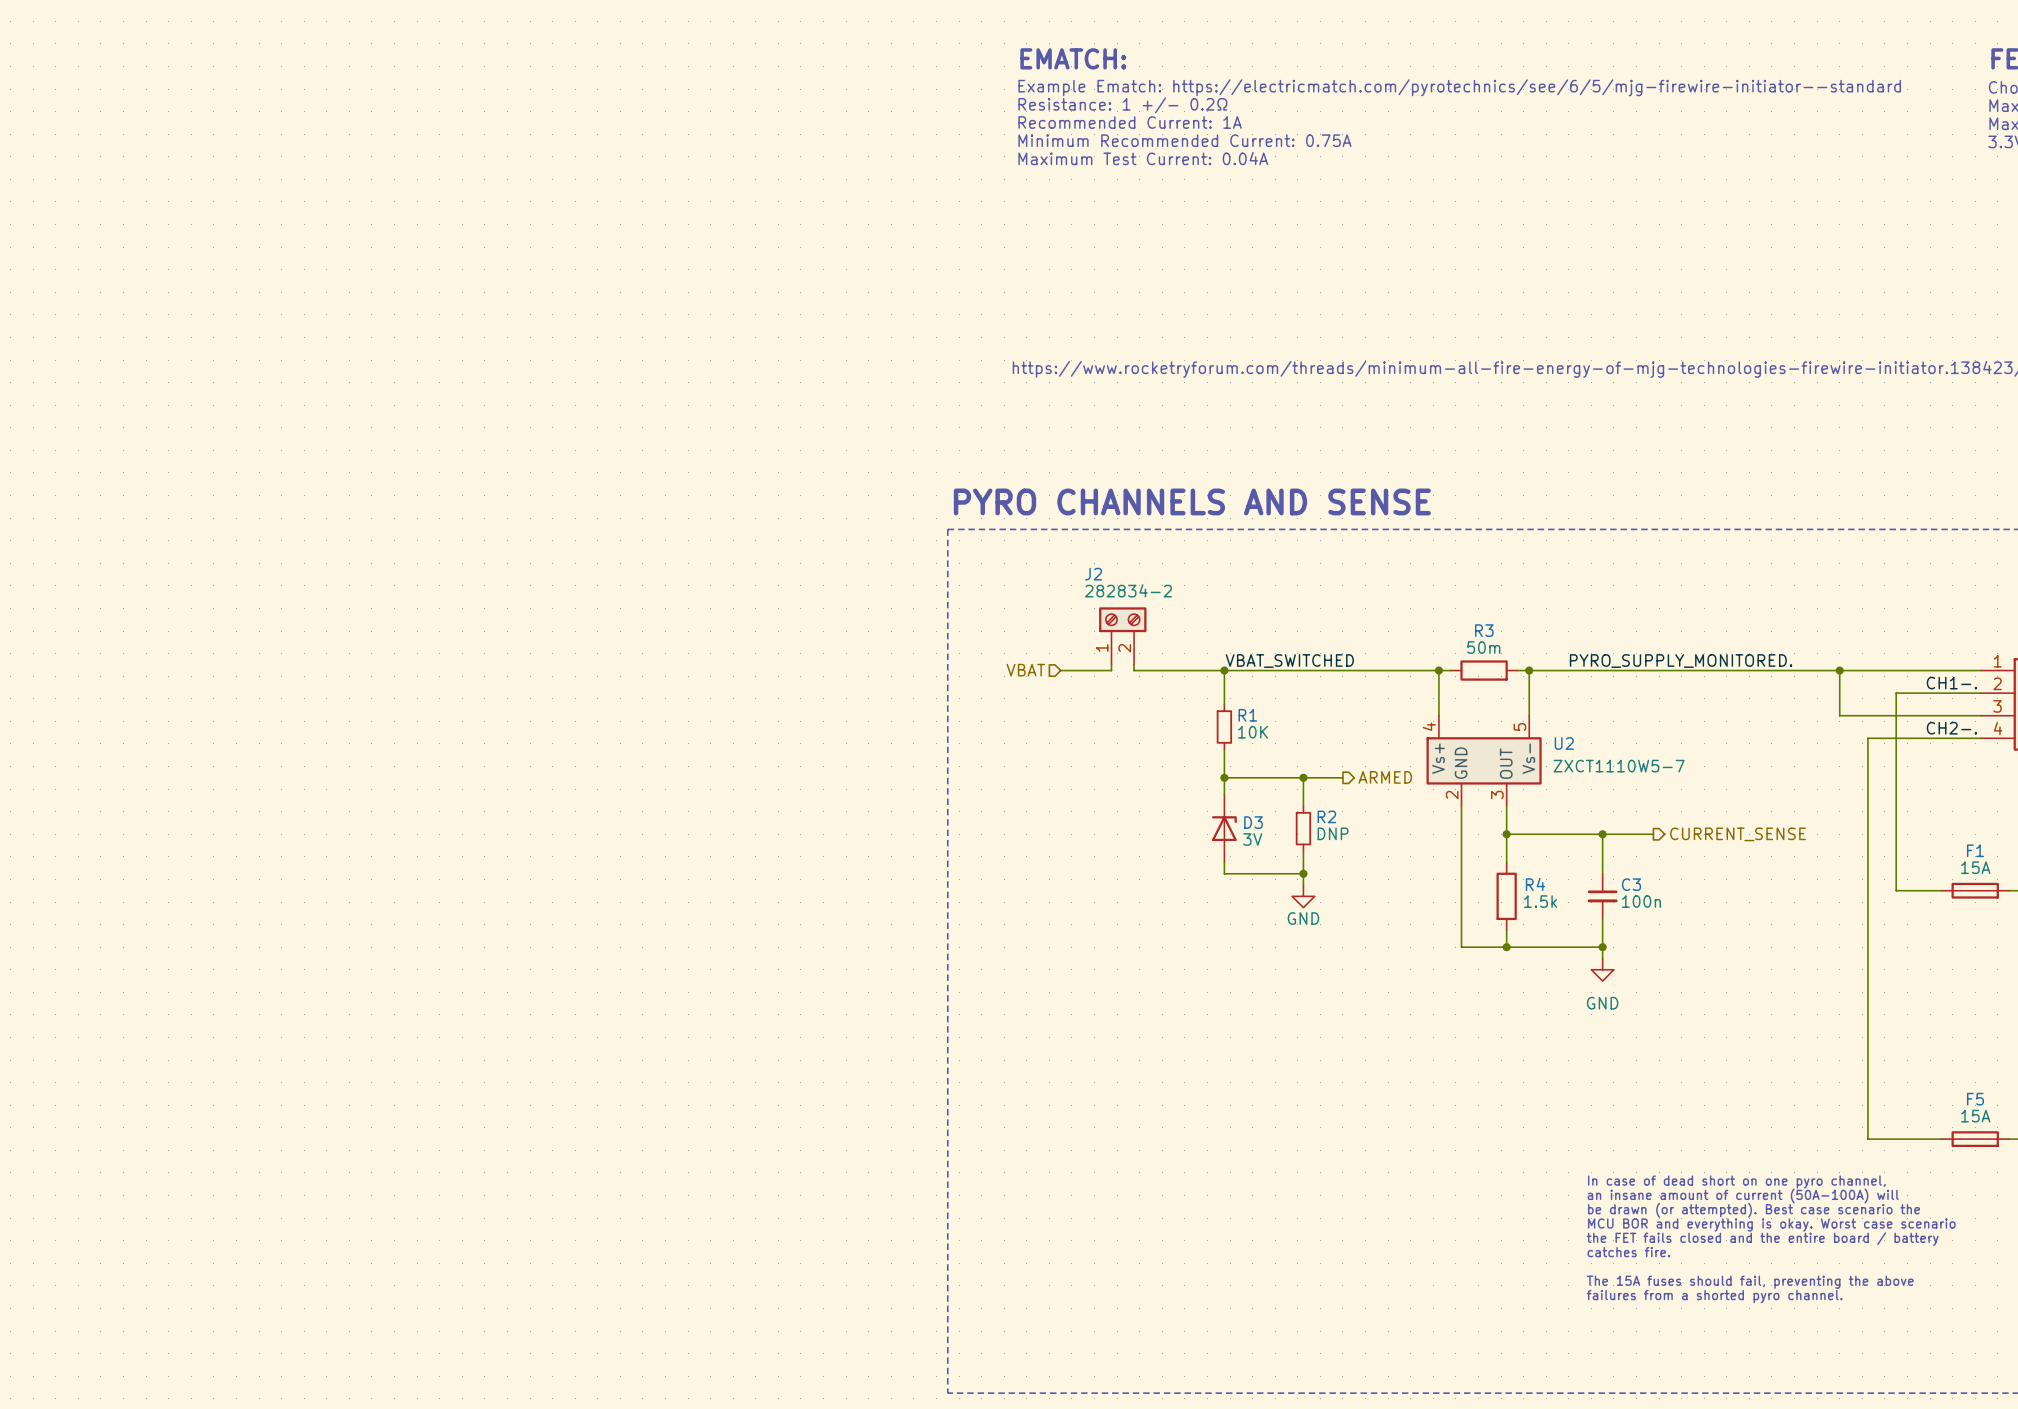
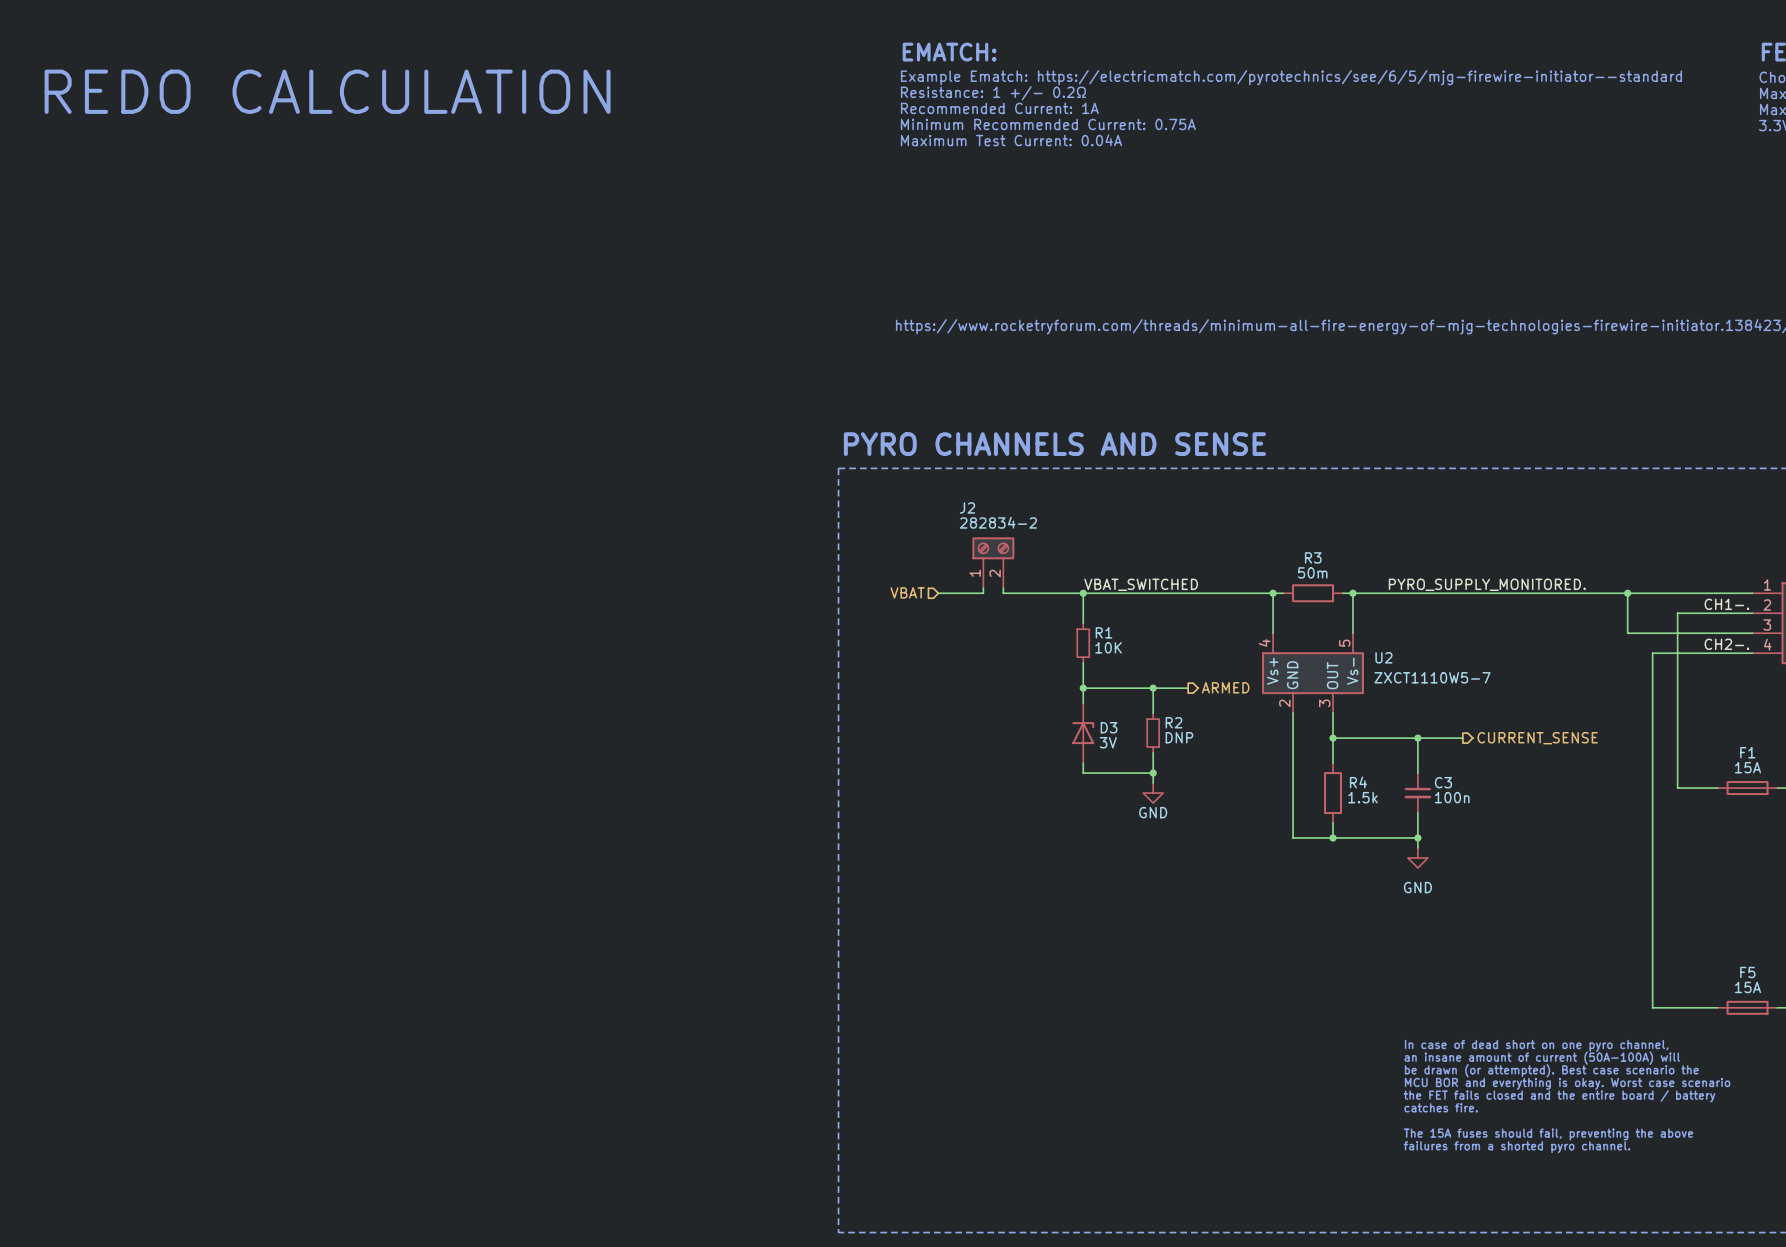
text: none -> REDO CALCULATION (327, 91)

